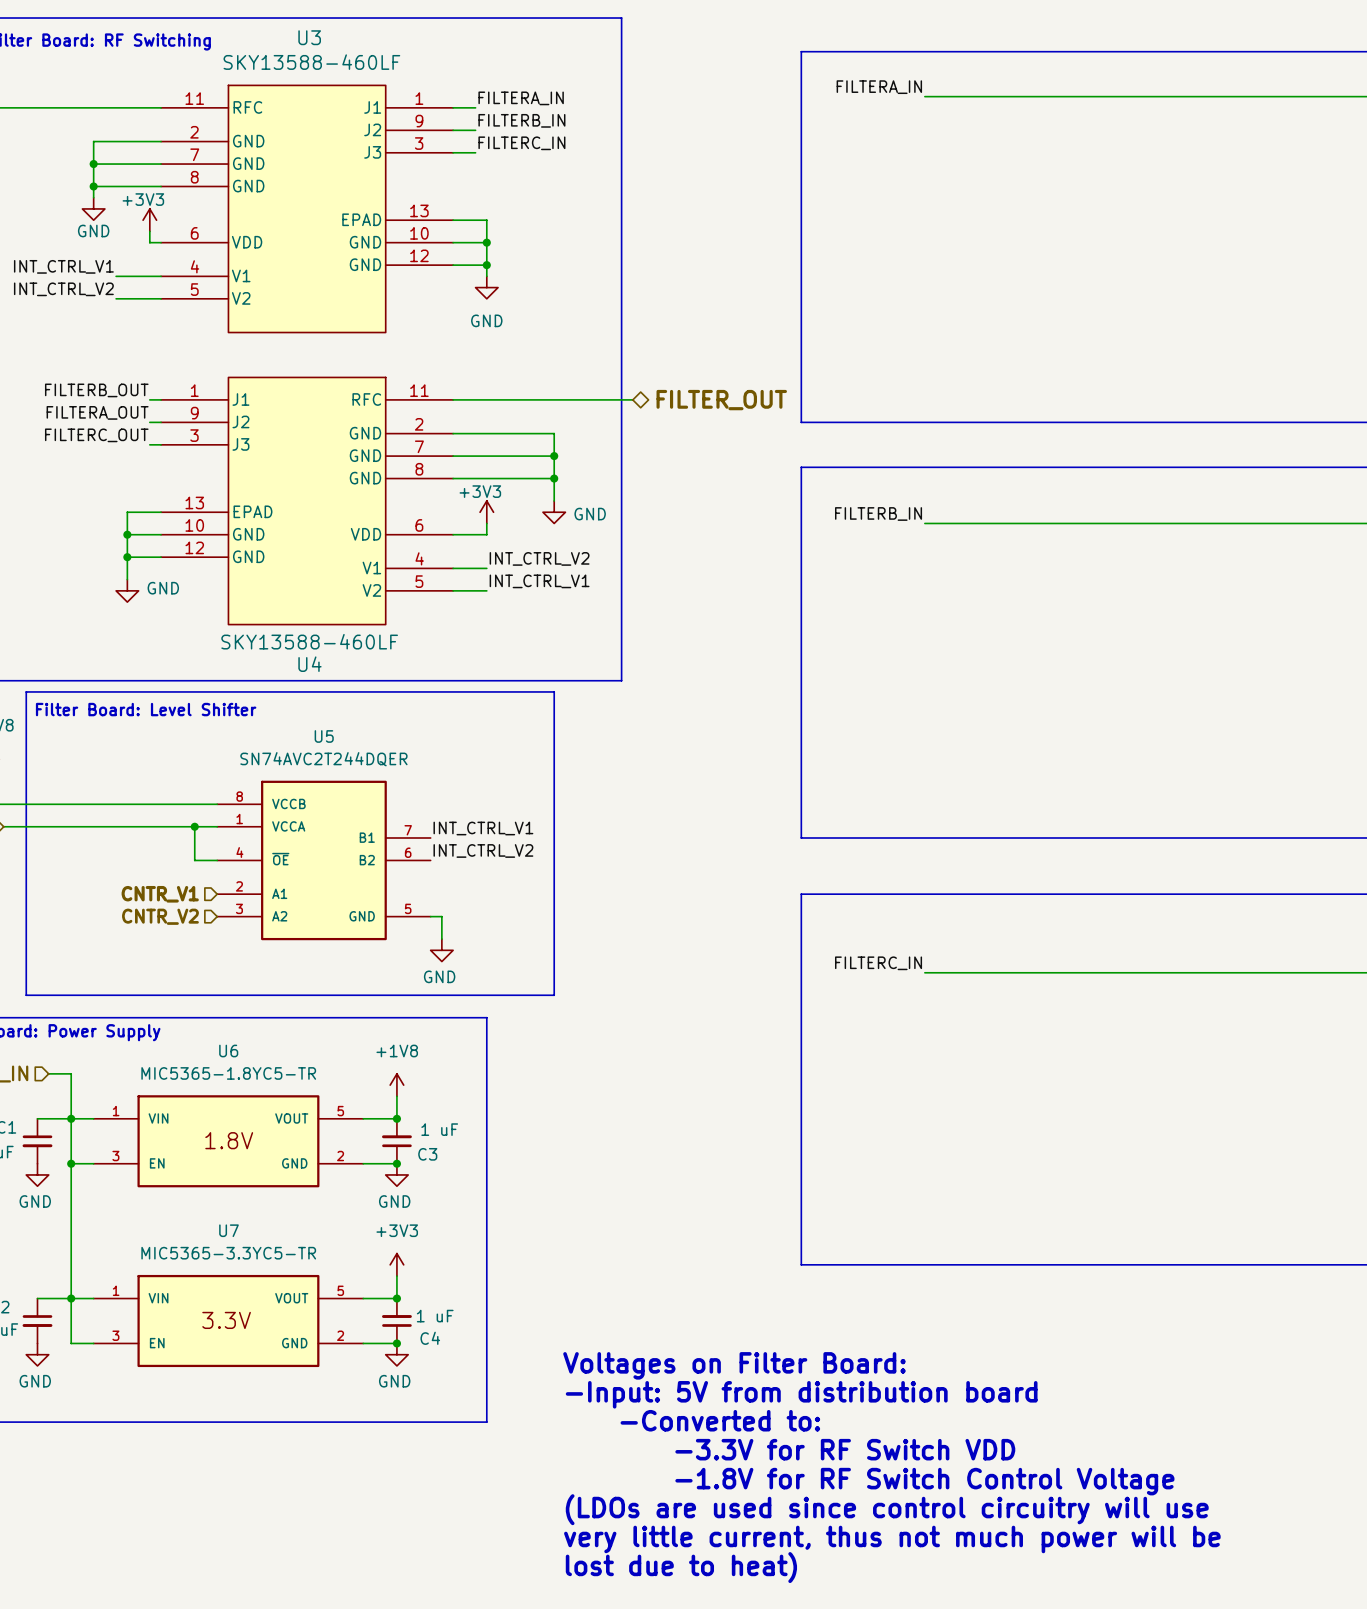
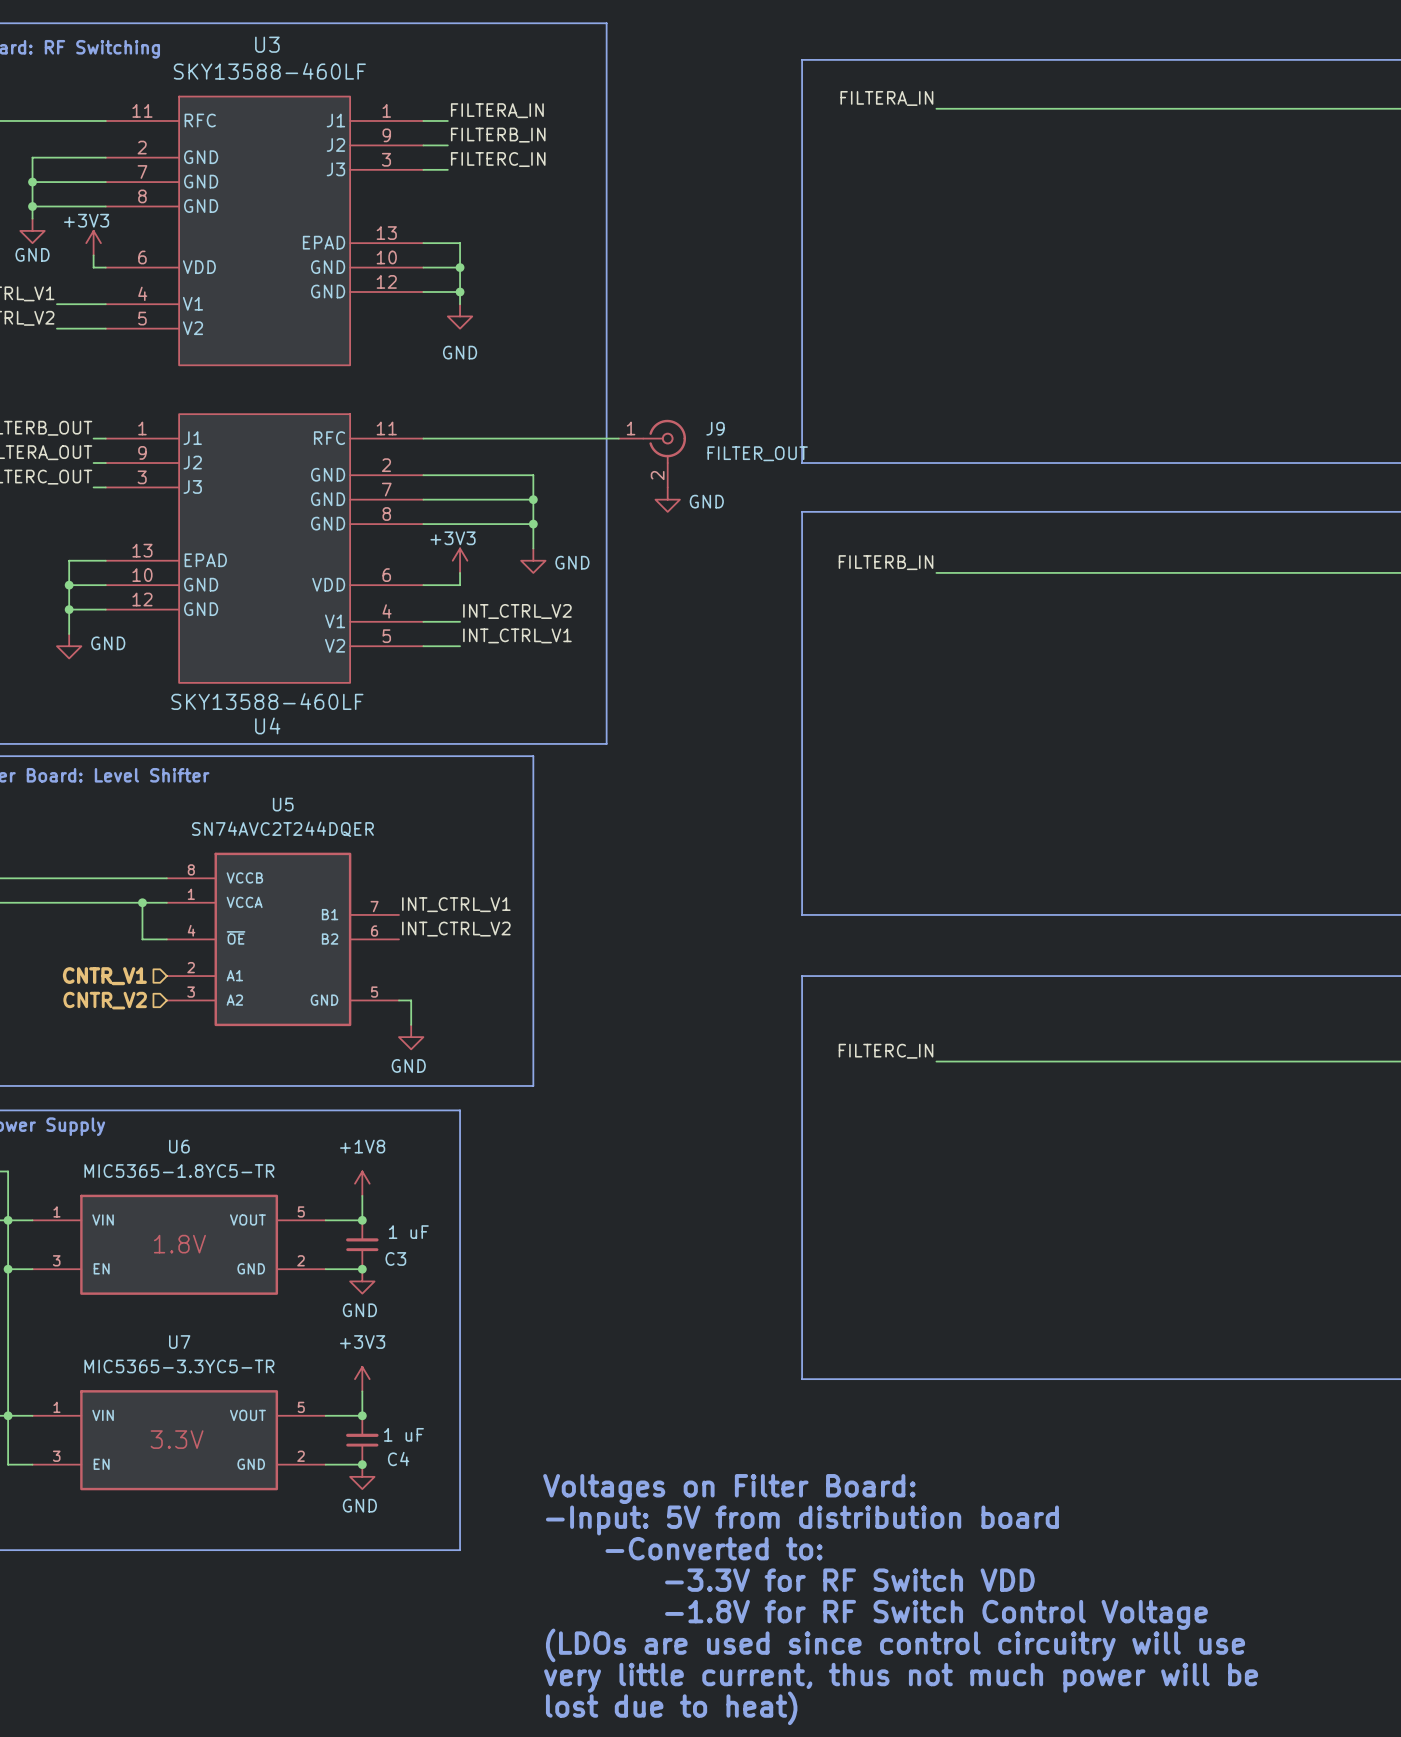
hierarchical label: FILTER_OUT (721, 400) -> none
J9: none -> FILTER_OUT (652, 453)
power symbol: none -> GND (667, 499)

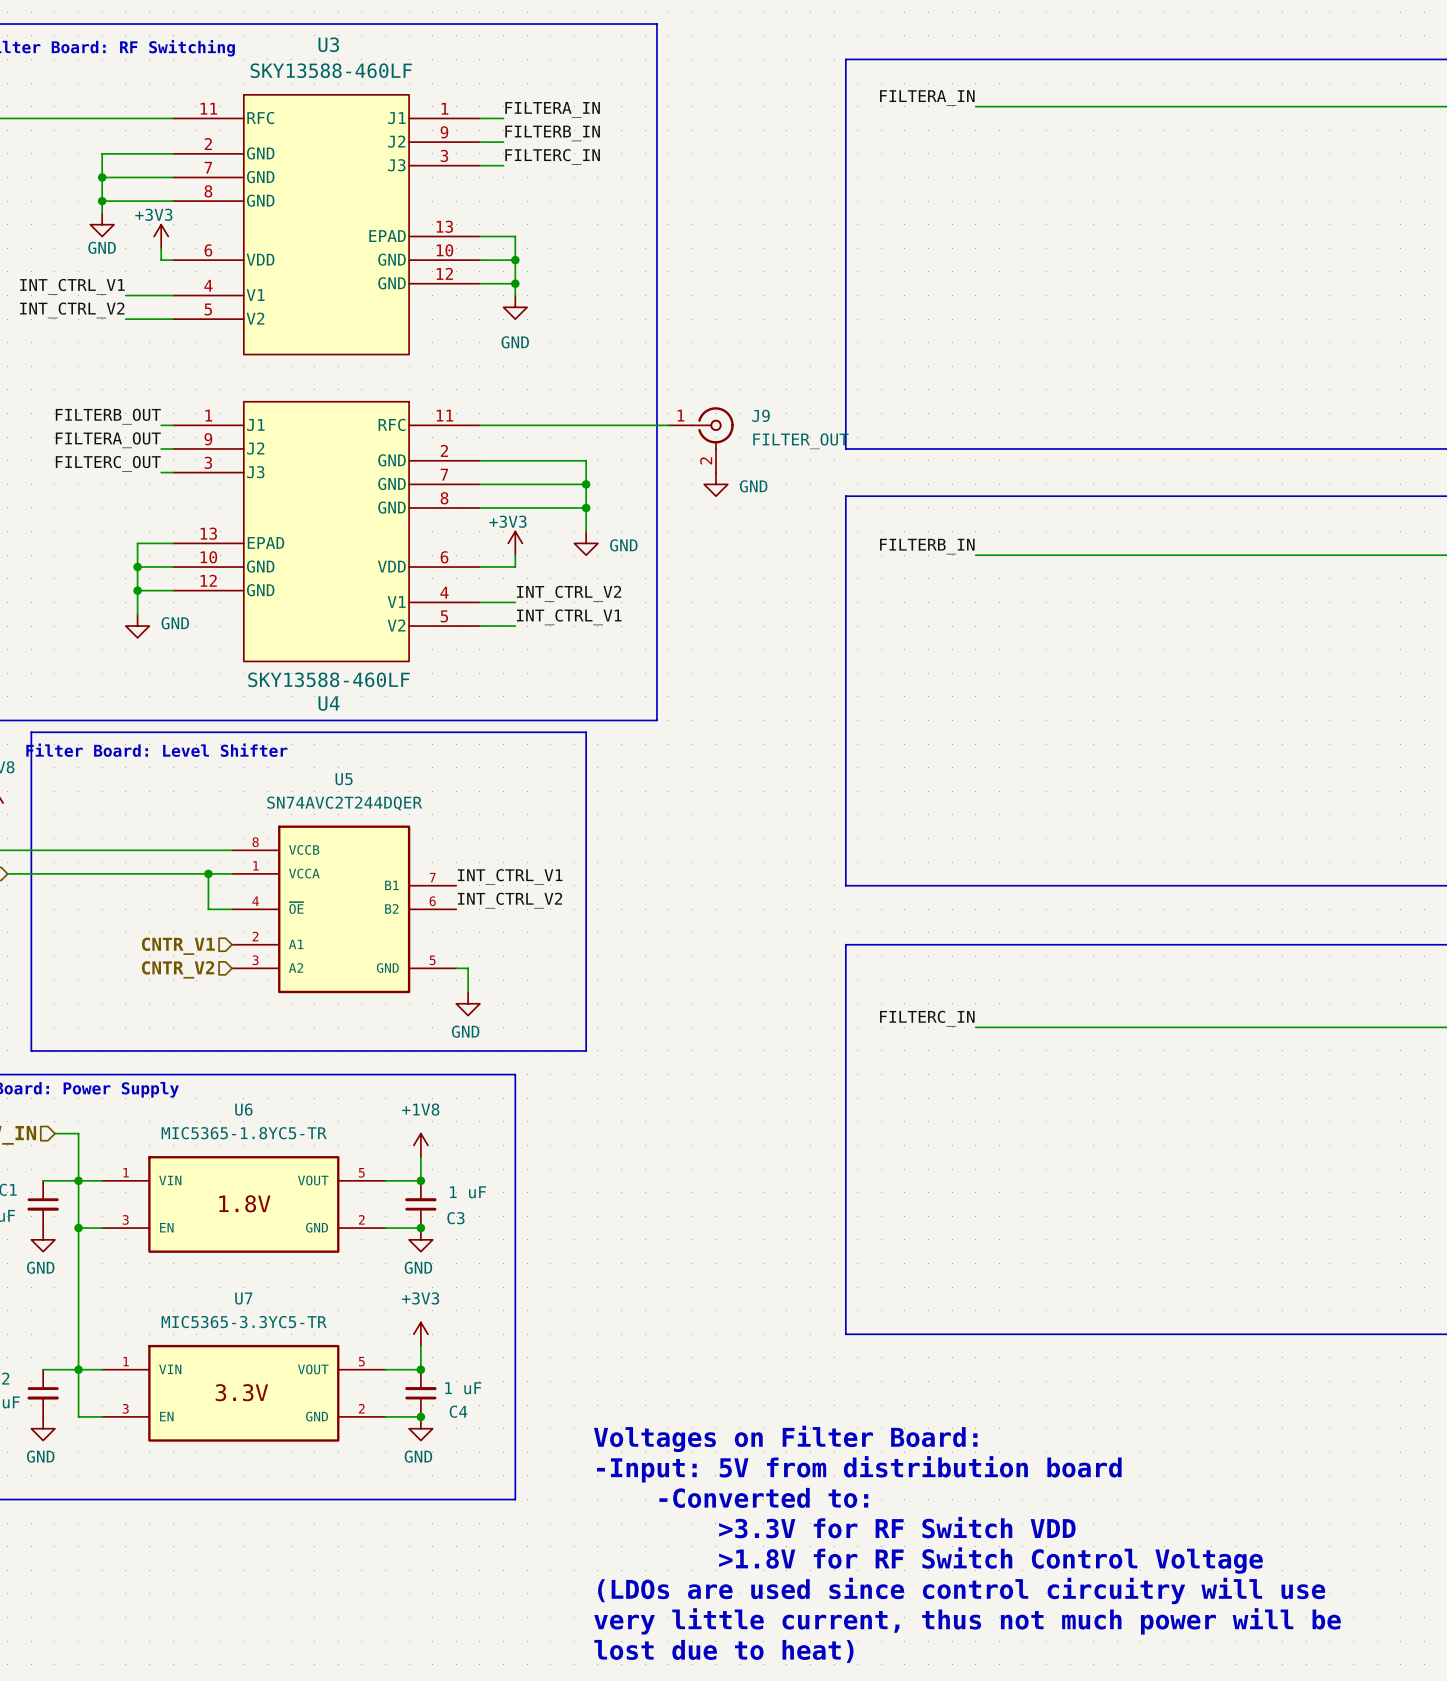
text: -3.3V for RF Switch VDD (849, 1580) -> >3.3V for RF Switch VDD (897, 1527)
text: -1.8V for RF Switch Control Voltage (936, 1614) -> >1.8V for RF Switch Control Voltage (990, 1560)

